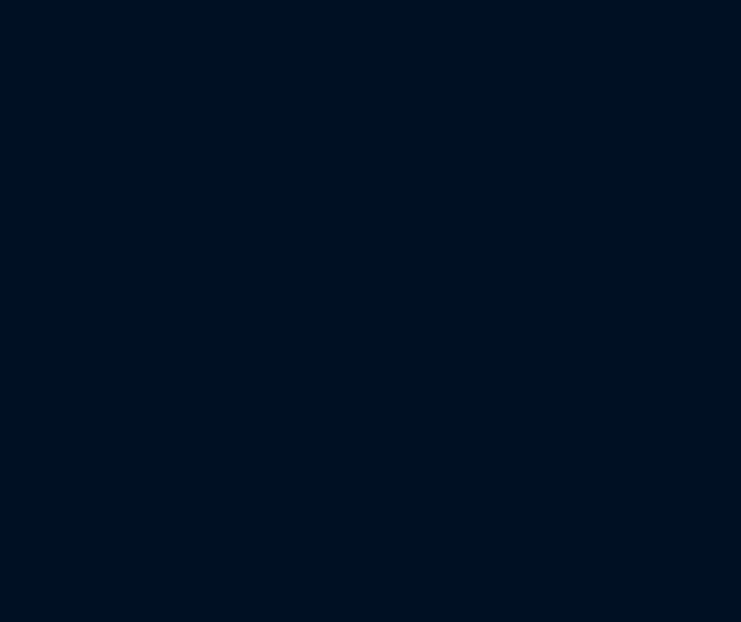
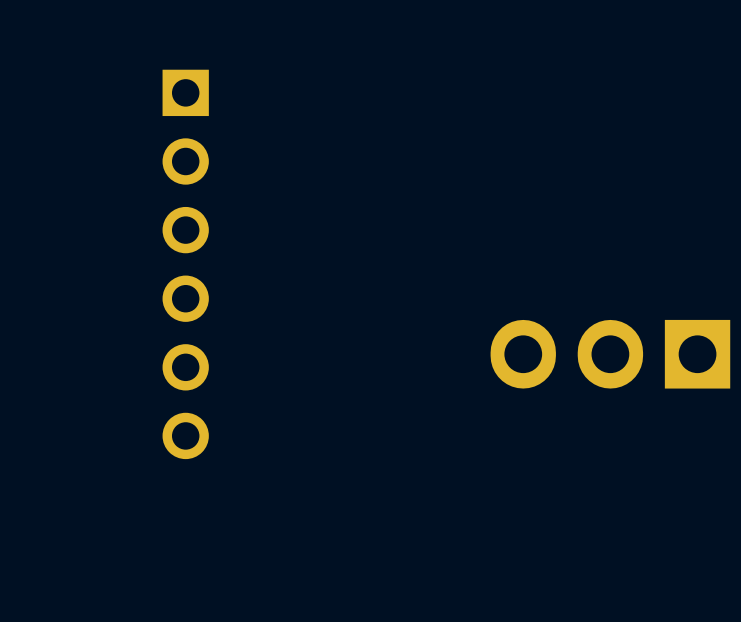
part: none -> (185, 264)
part: none -> (610, 354)

